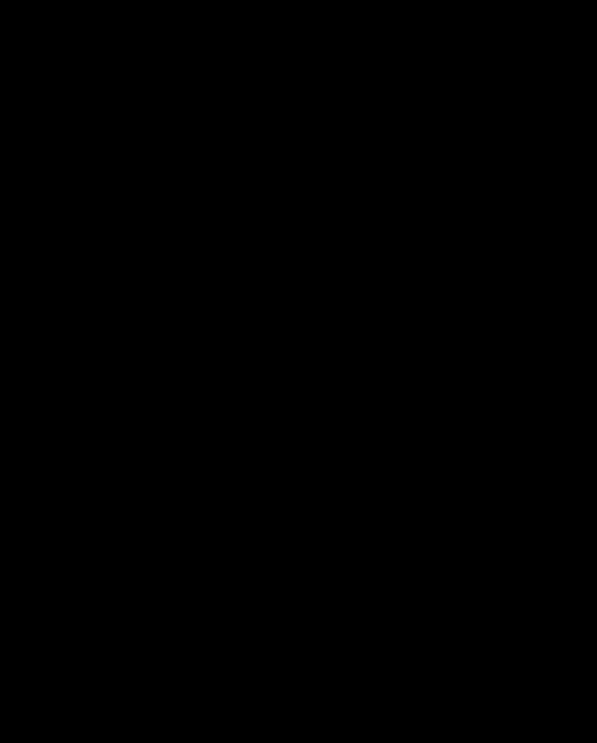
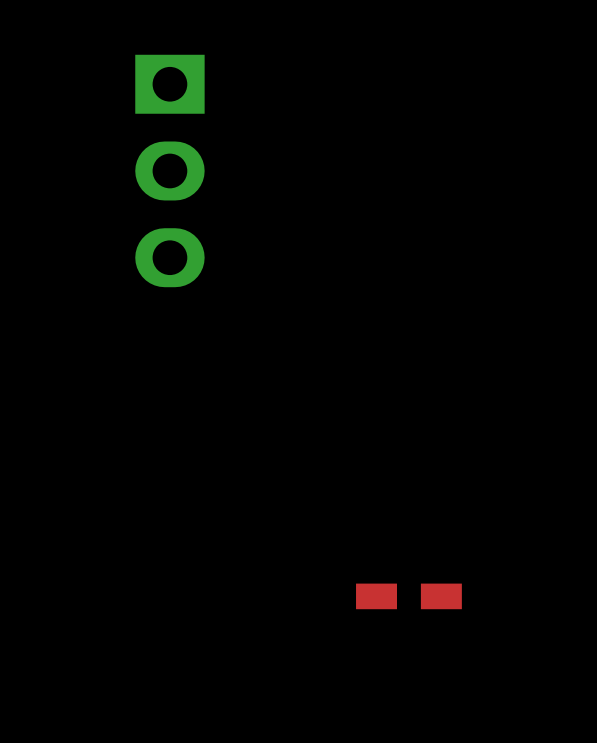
part: none -> (169, 170)
part: none -> (408, 596)

